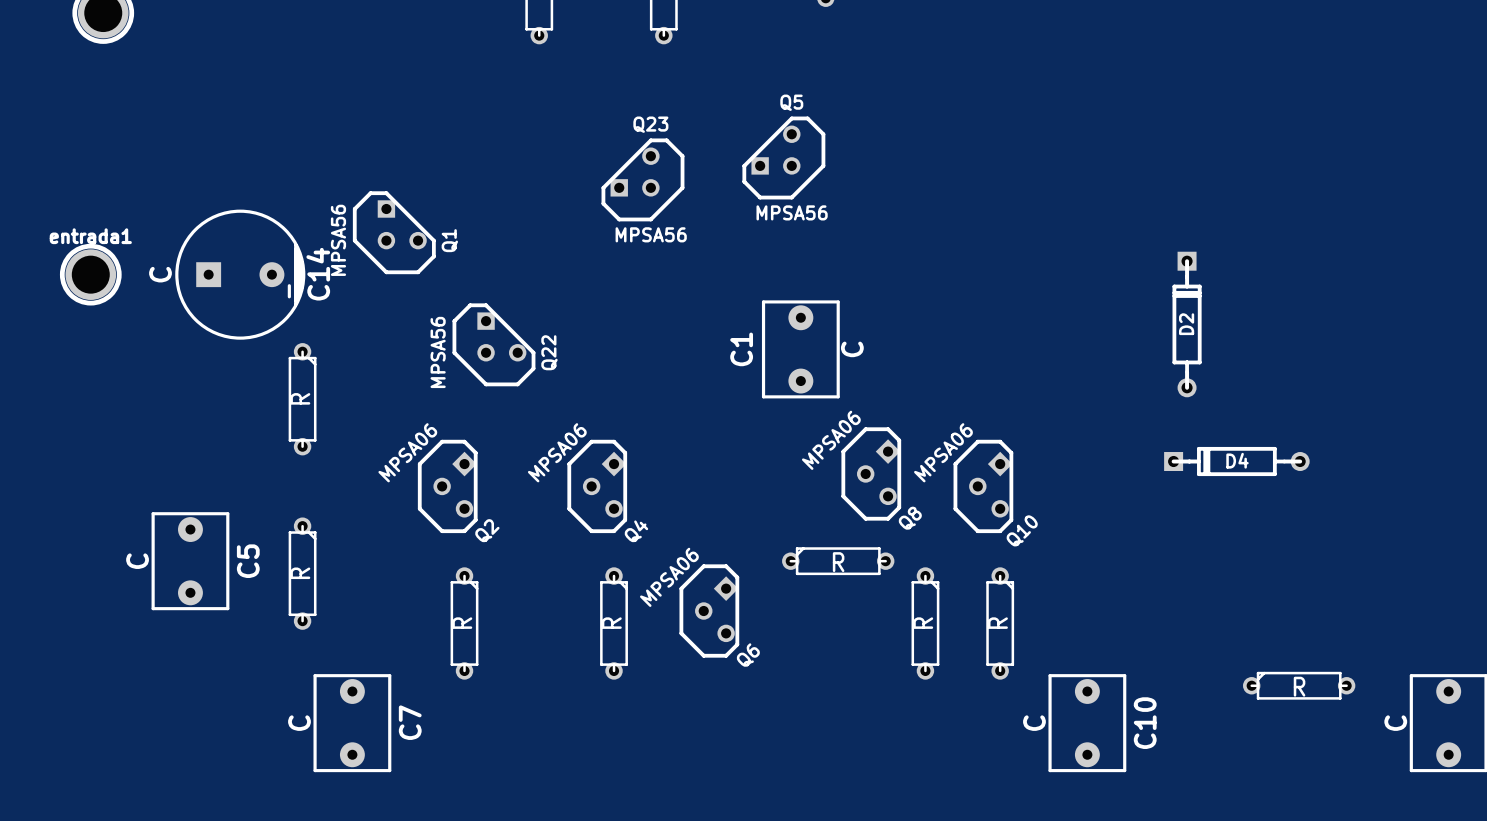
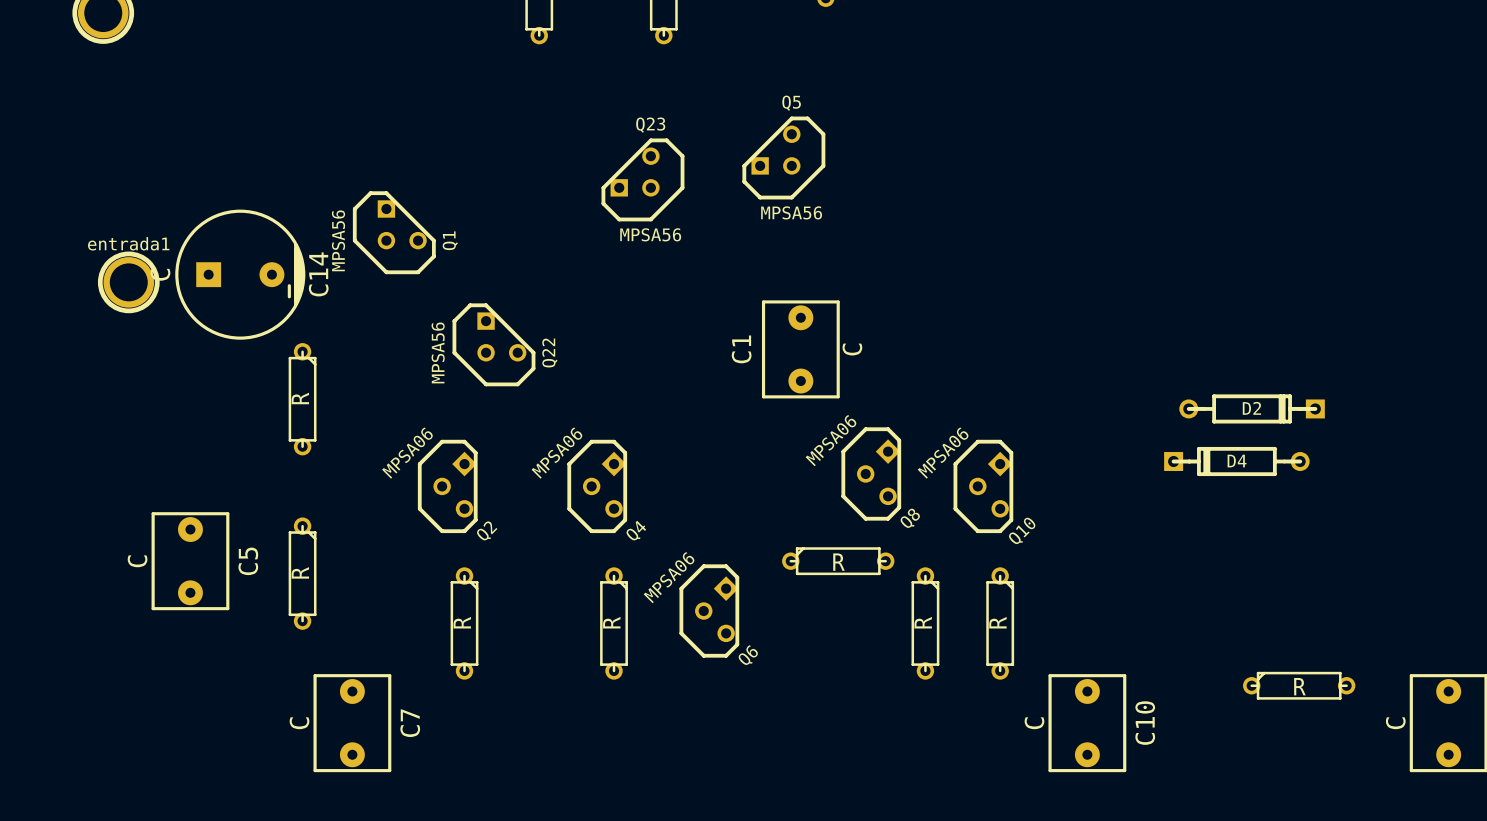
entrada1 position: (90, 274) -> (128, 282)
D2 rotation: 0° (1187, 324) -> 90° clockwise (1252, 408)
D2 position: (1187, 324) -> (1252, 408)

